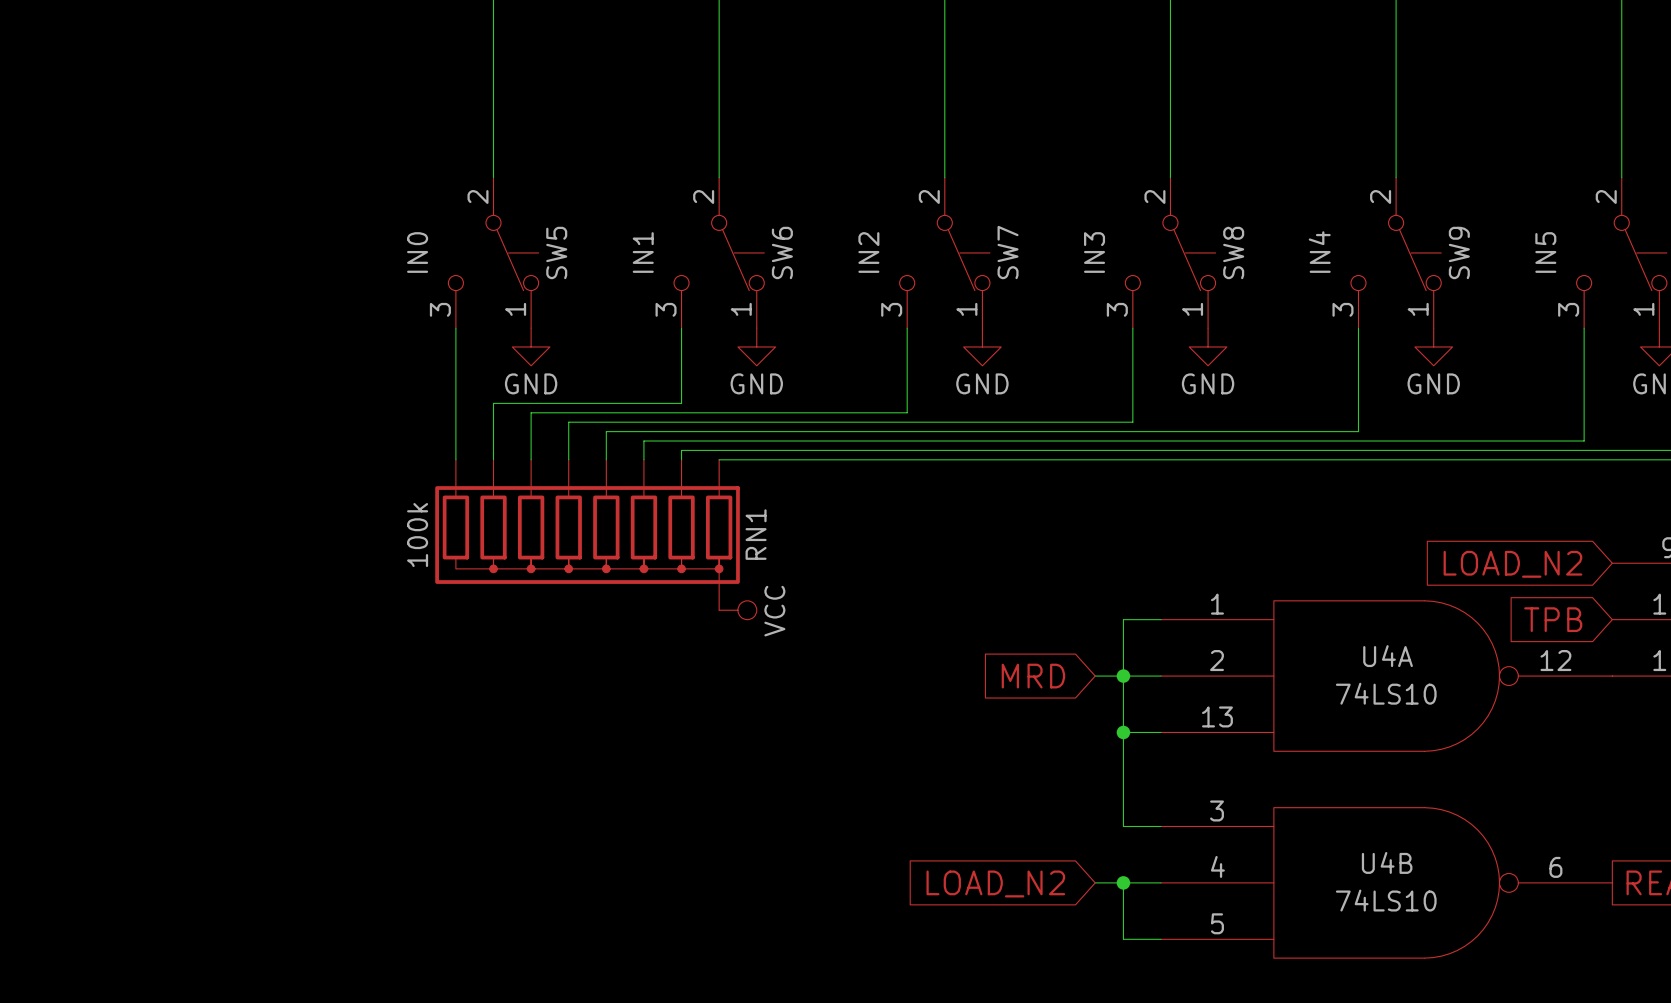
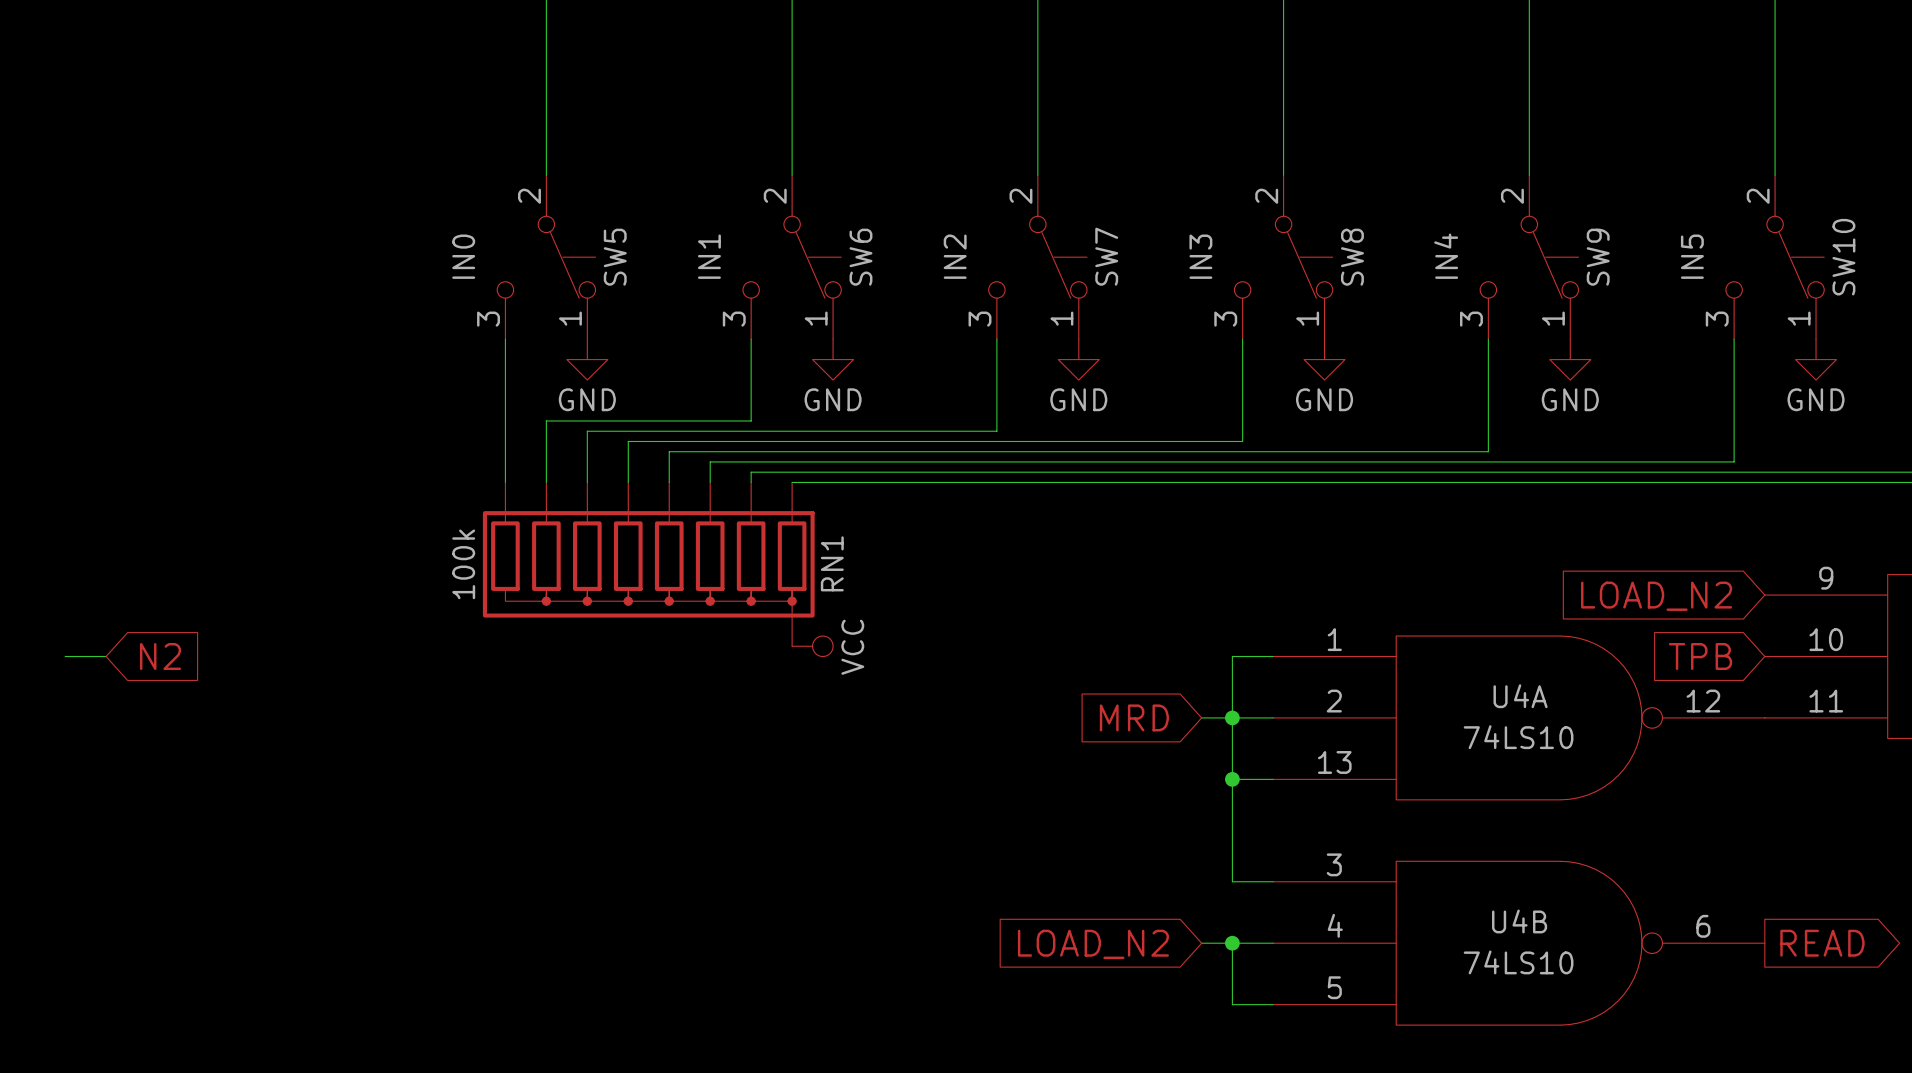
wire: none -> (65, 656) (106, 656)
global label: none -> N2 (160, 656)

